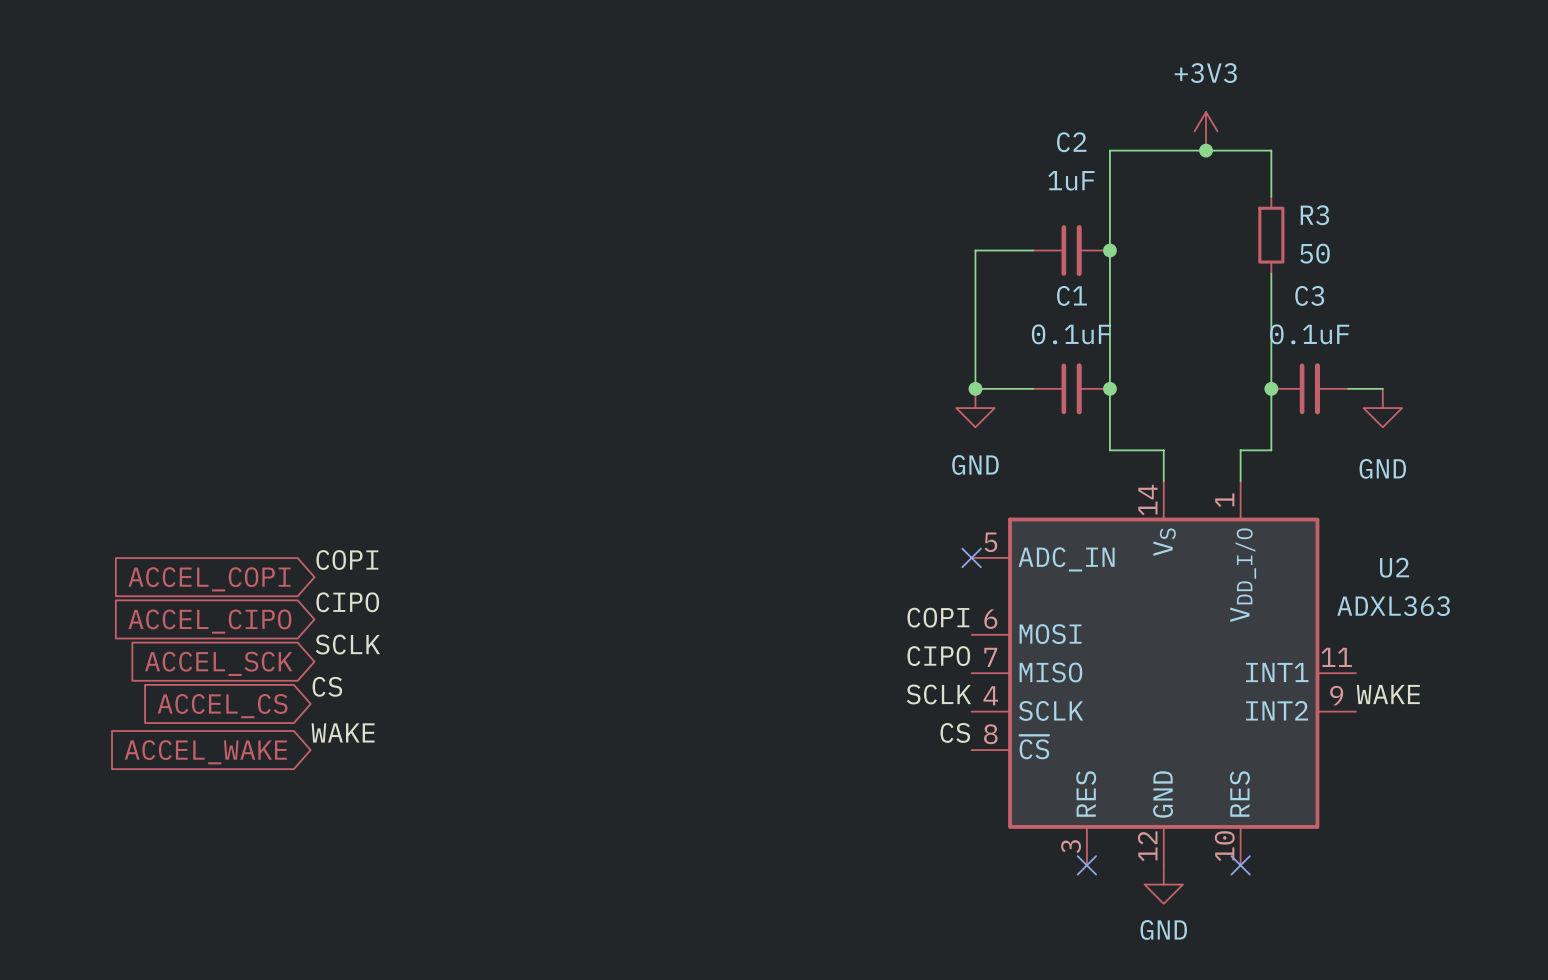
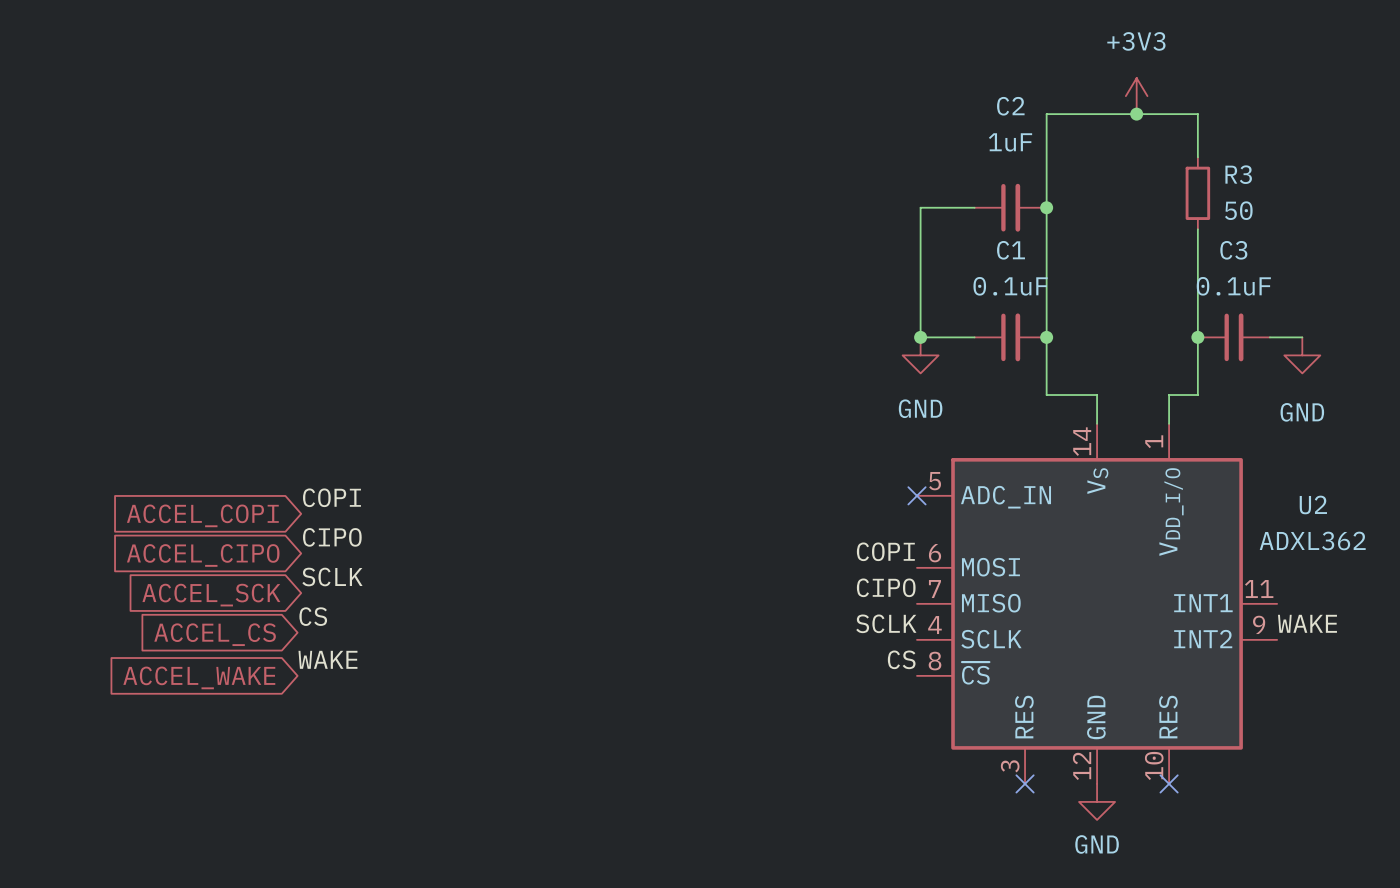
U2 value: ADXL363 (1393, 606) -> ADXL362 (1312, 540)

